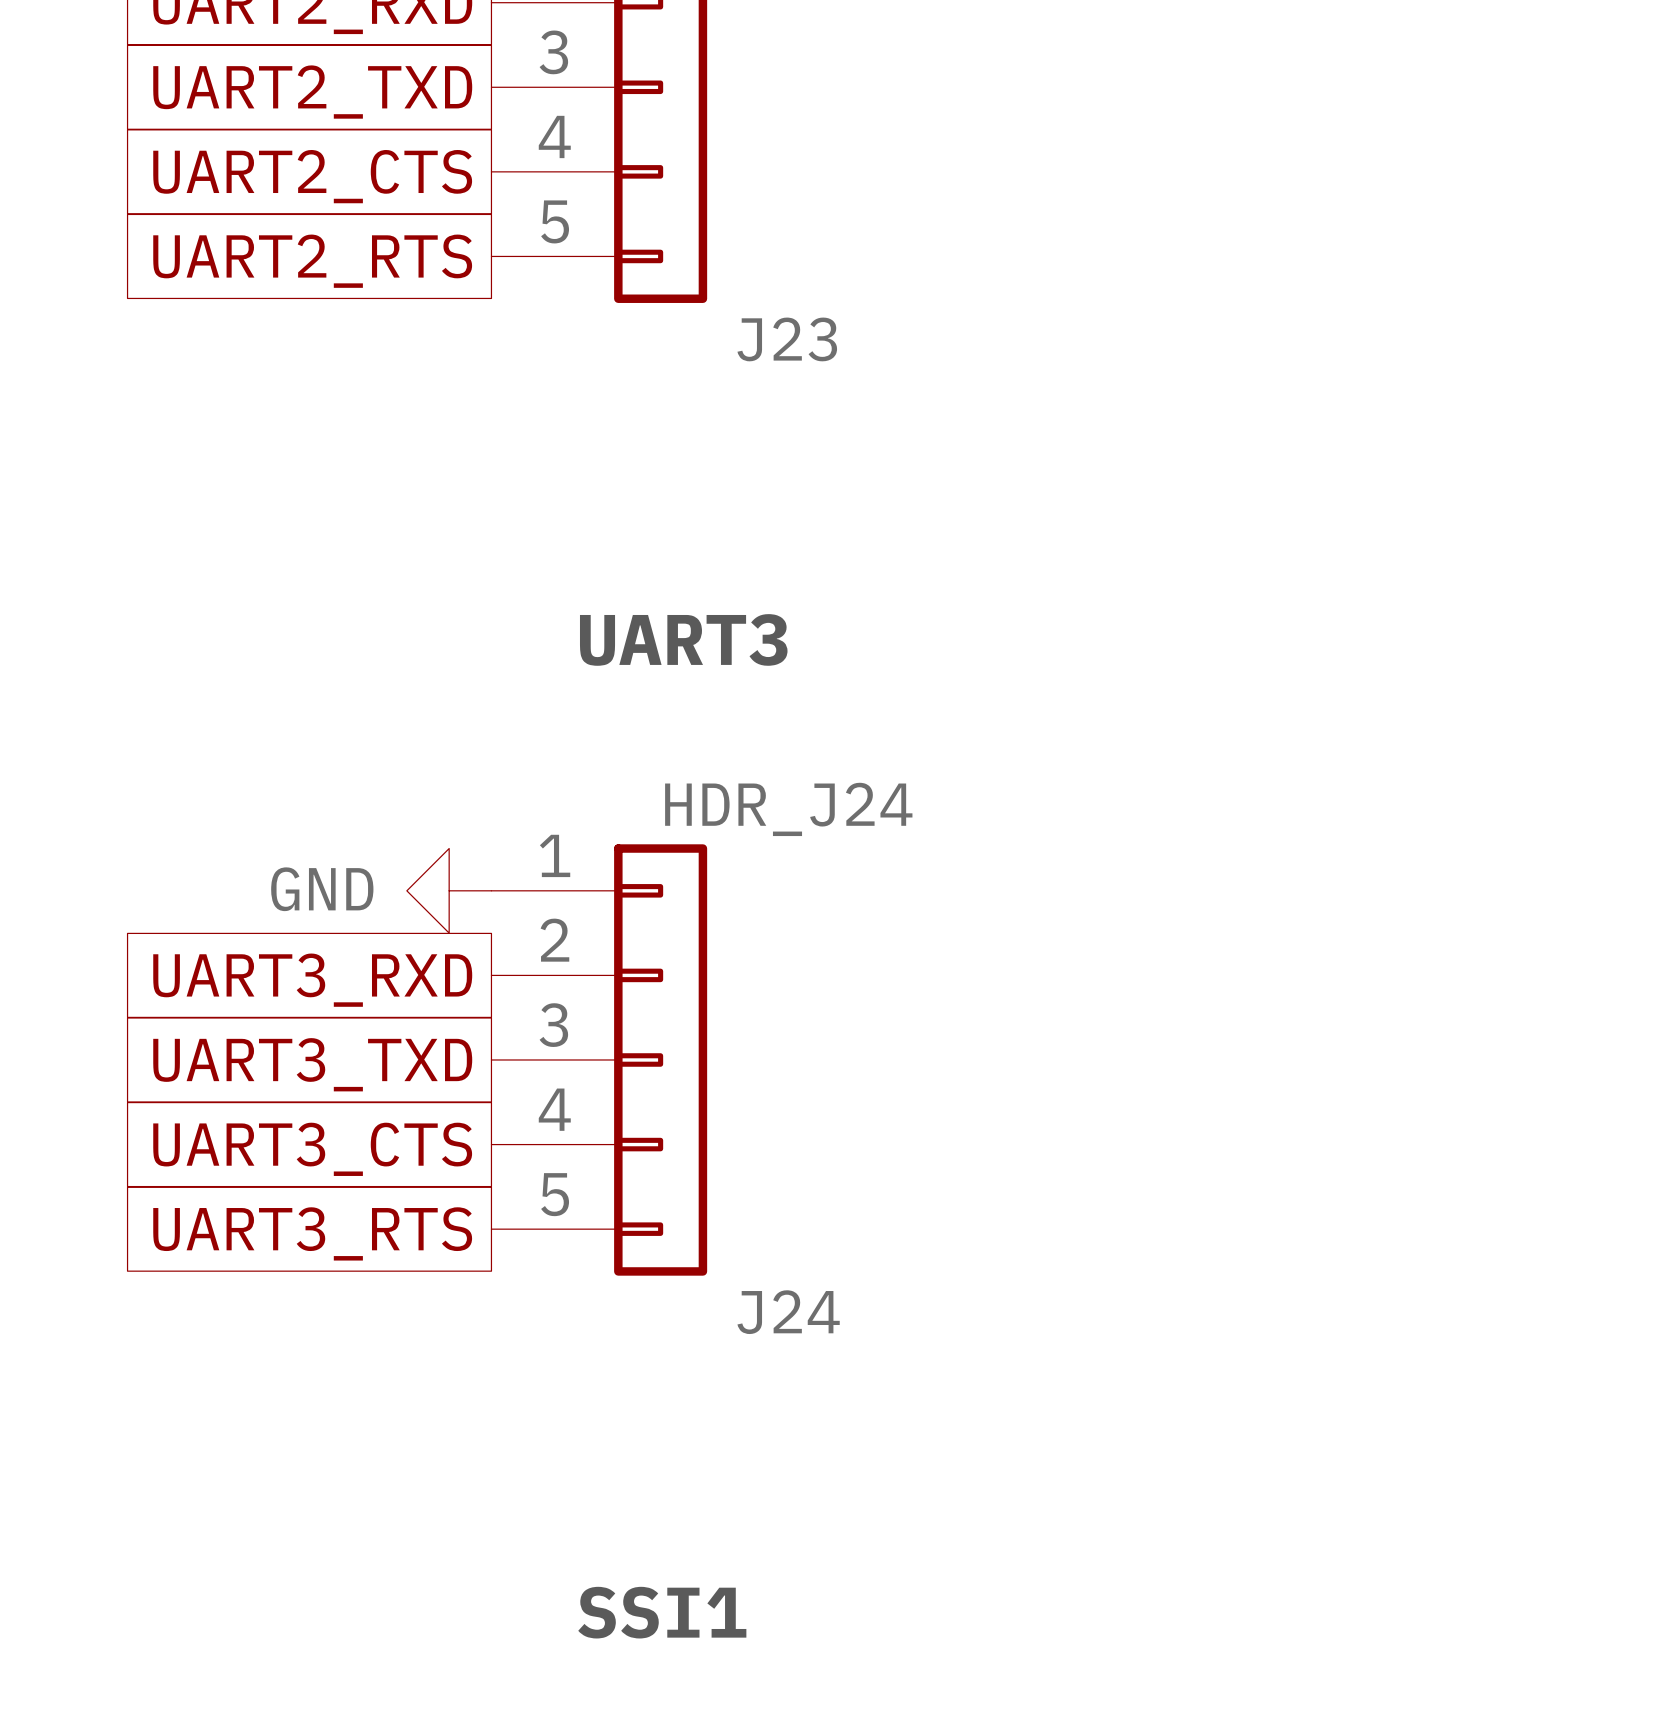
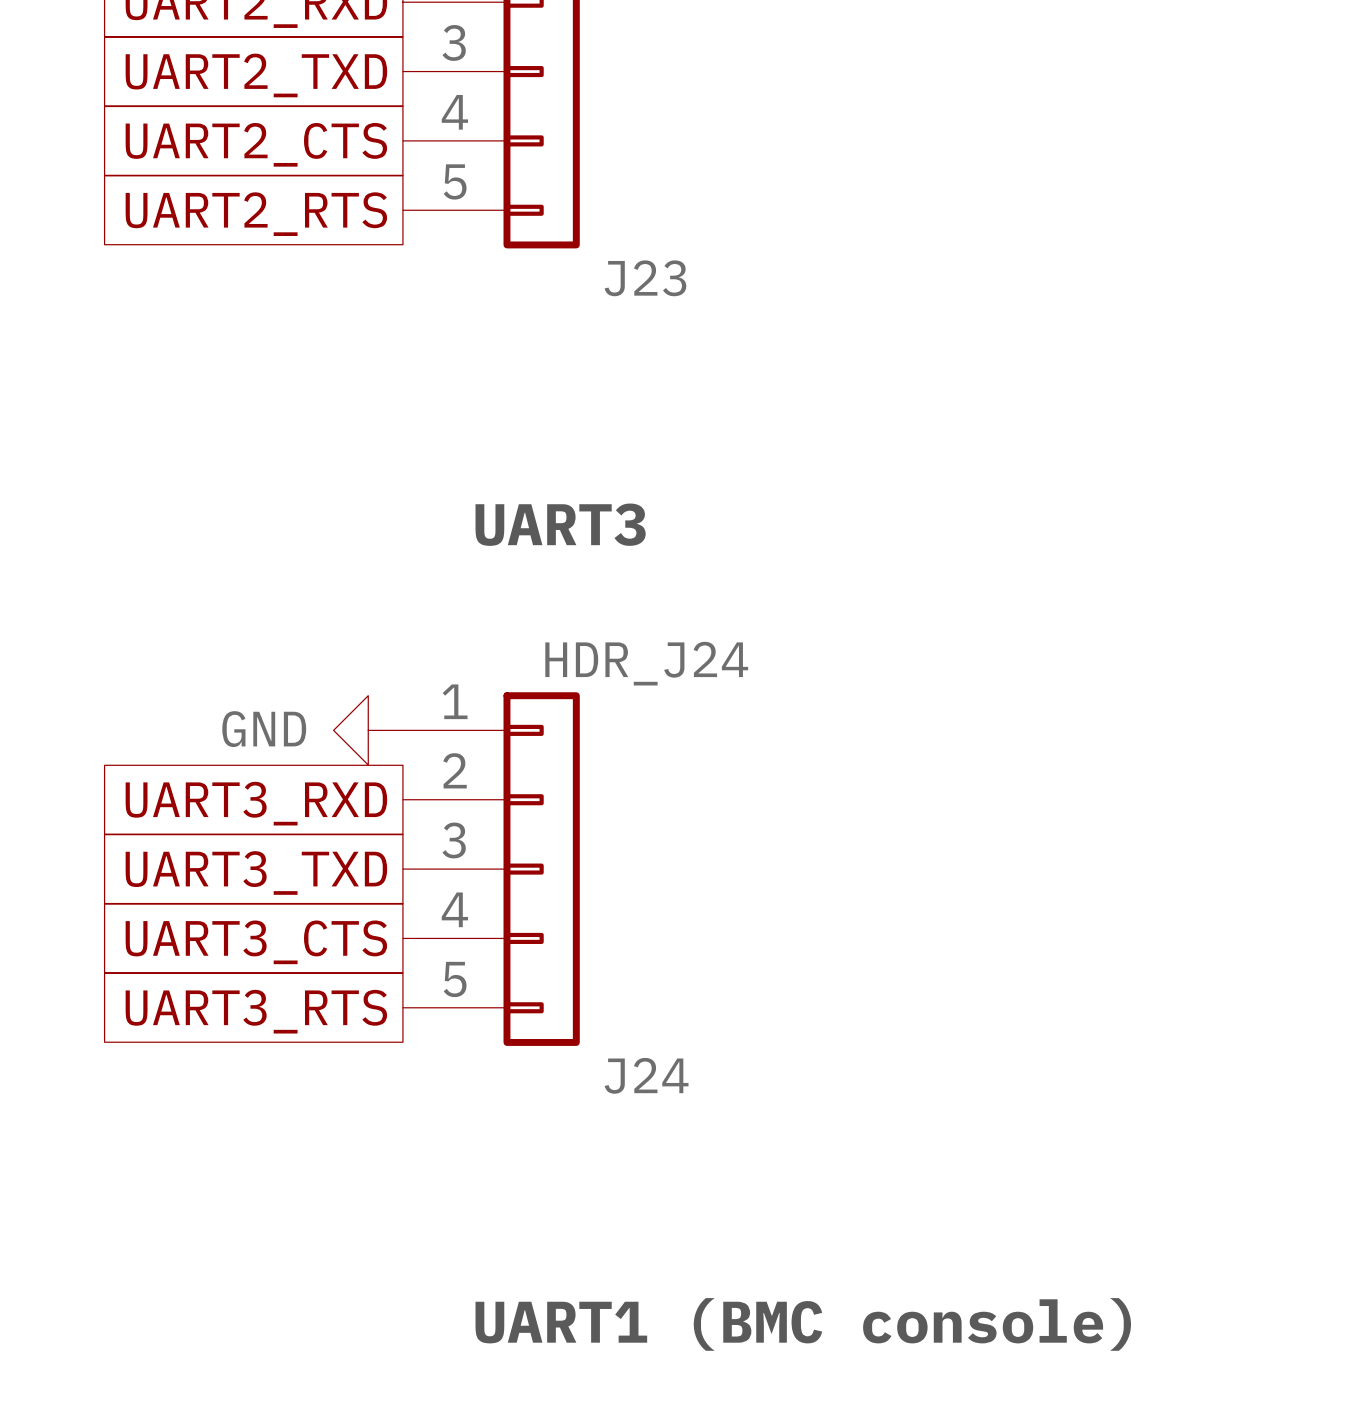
text: SSI1 (662, 1612) -> UART1 (BMC console) (803, 1324)

